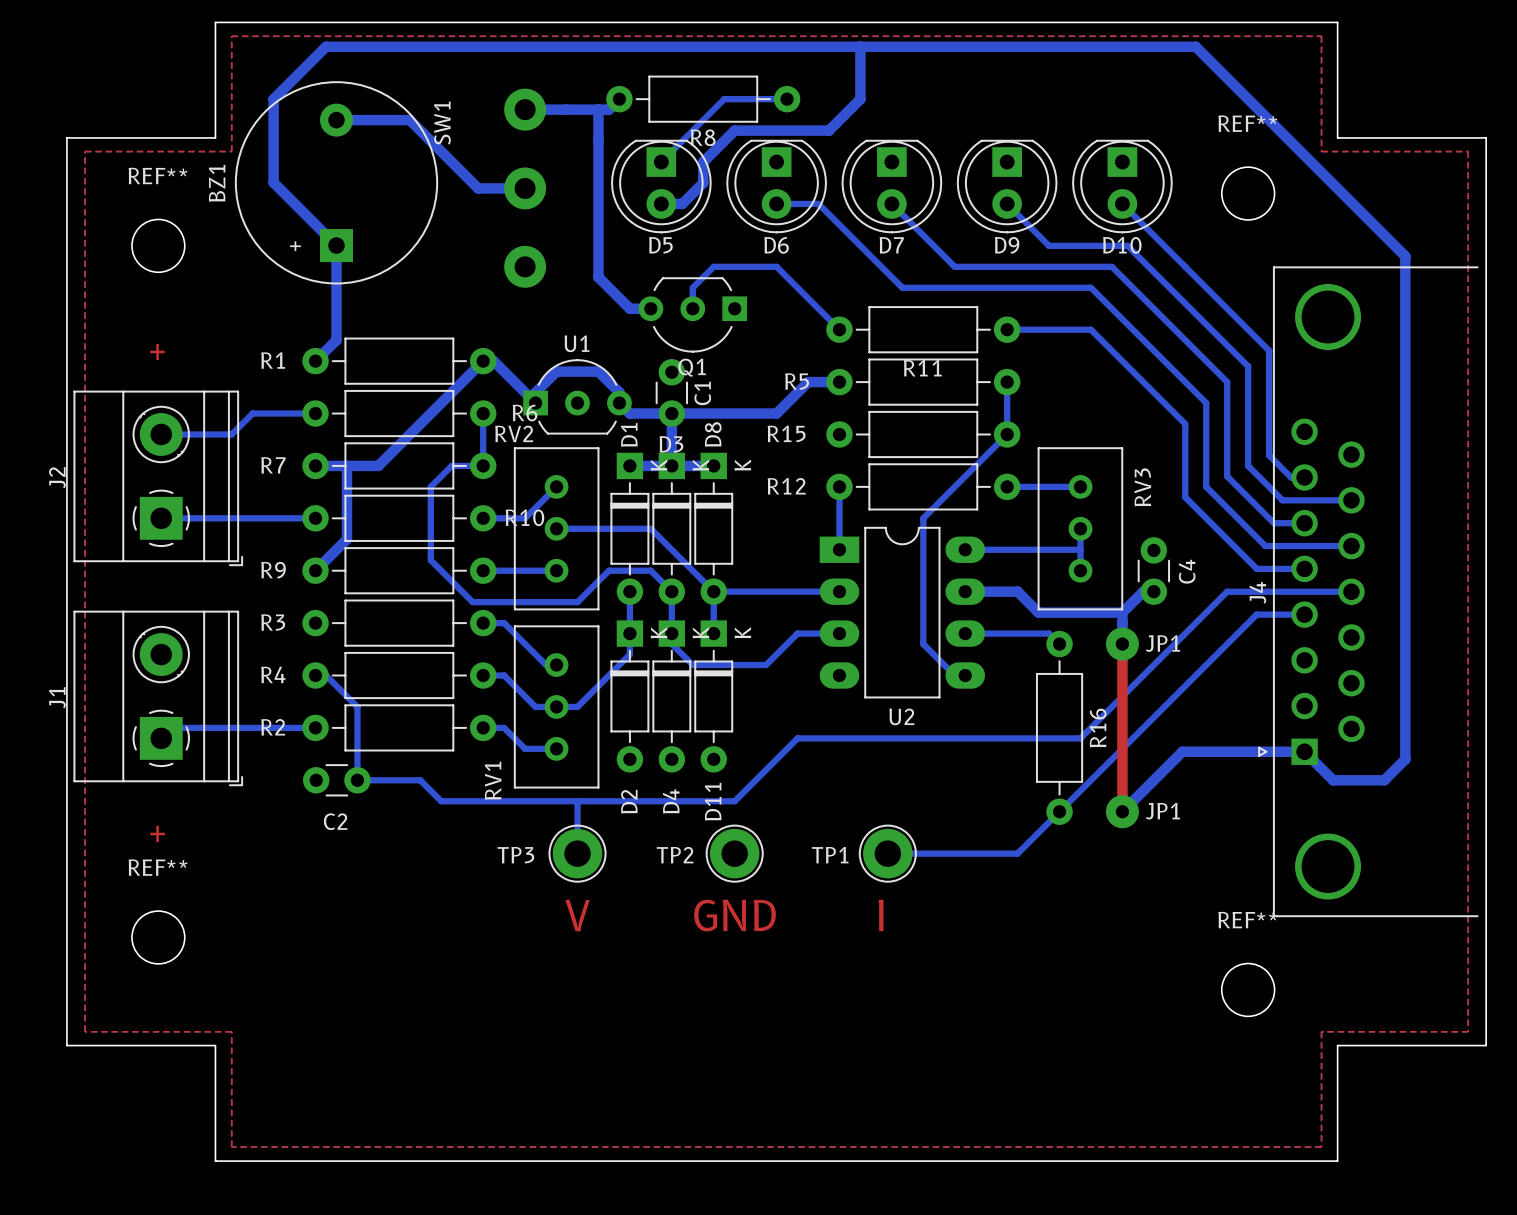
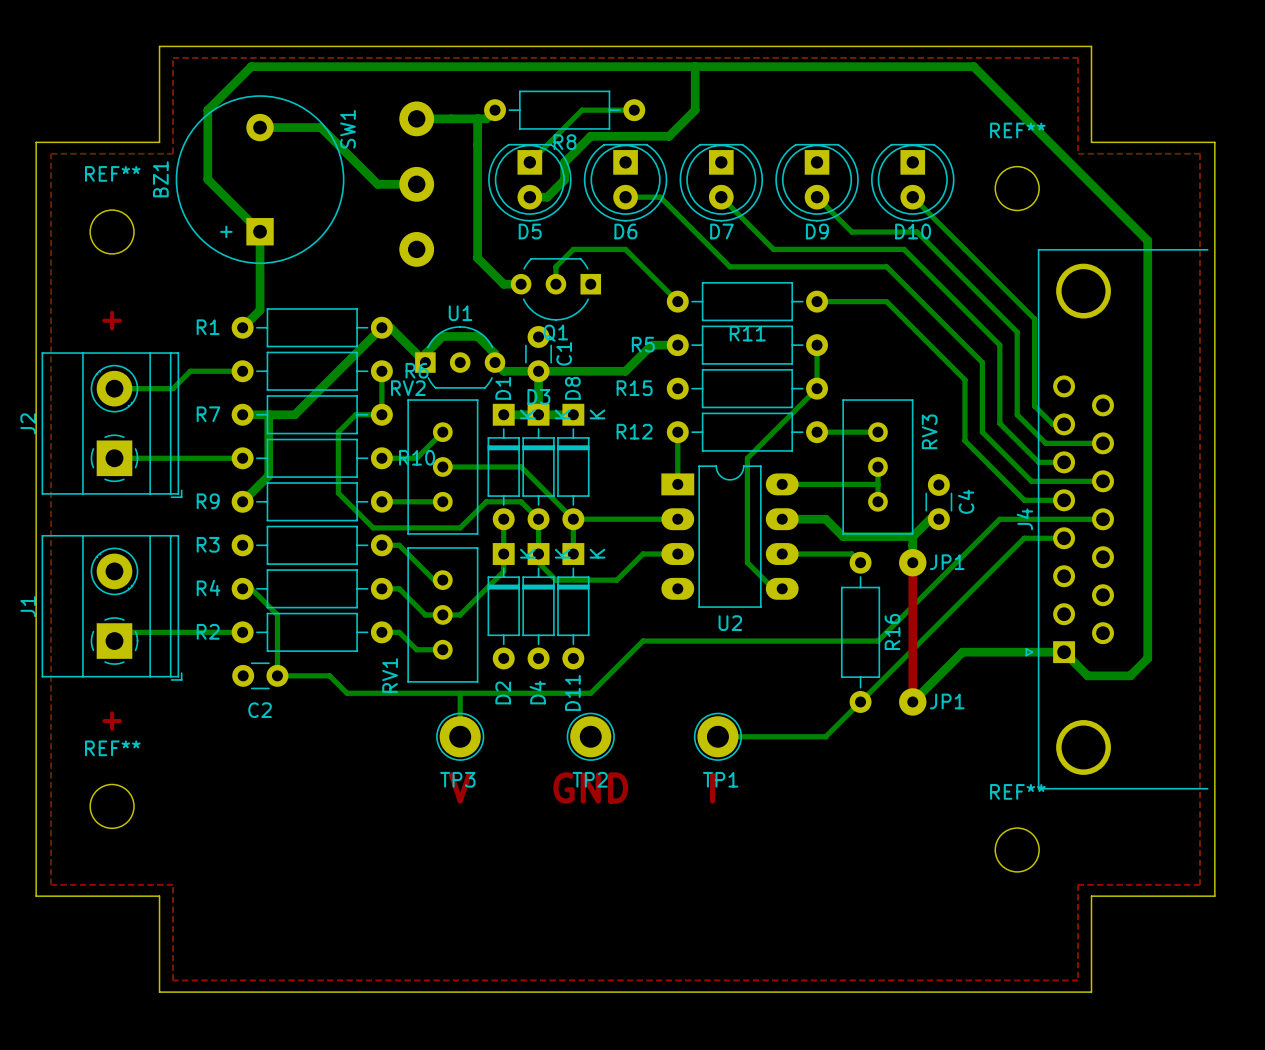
TP3 name position: TP3 (515, 855) -> TP3 (457, 779)
TP2 name position: TP2 (675, 855) -> TP2 (590, 779)
TP1 name position: TP1 (830, 855) -> TP1 (720, 779)

